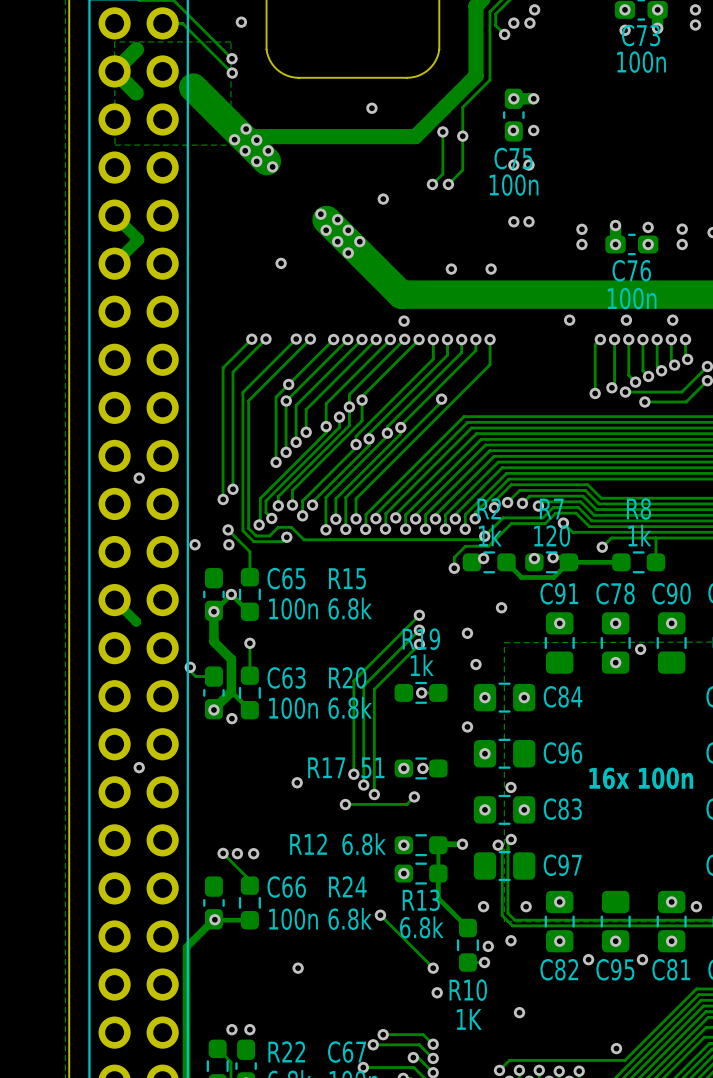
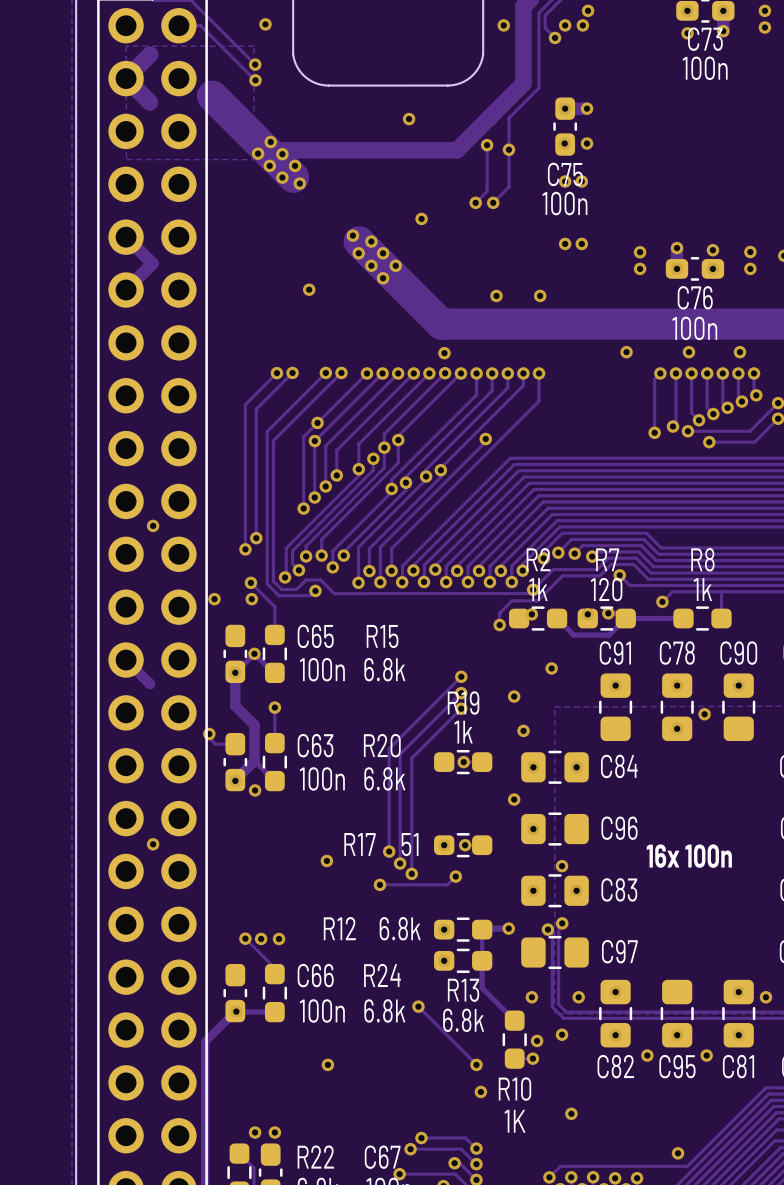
via: none -> (503, 25)

